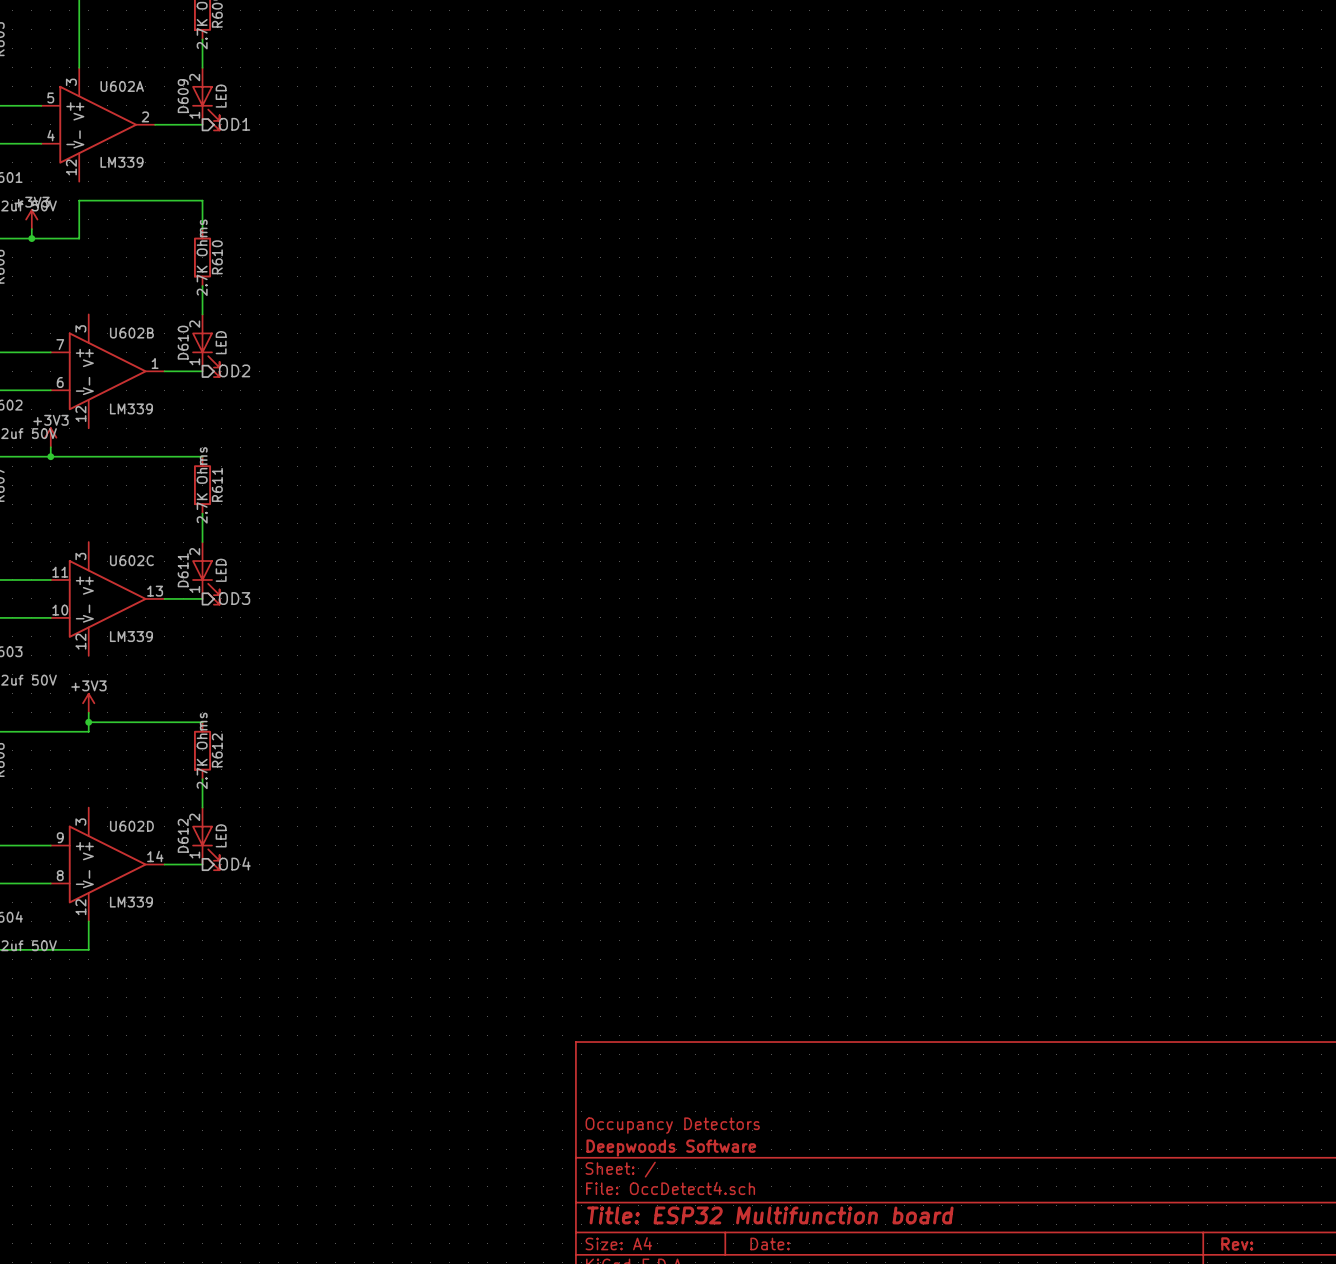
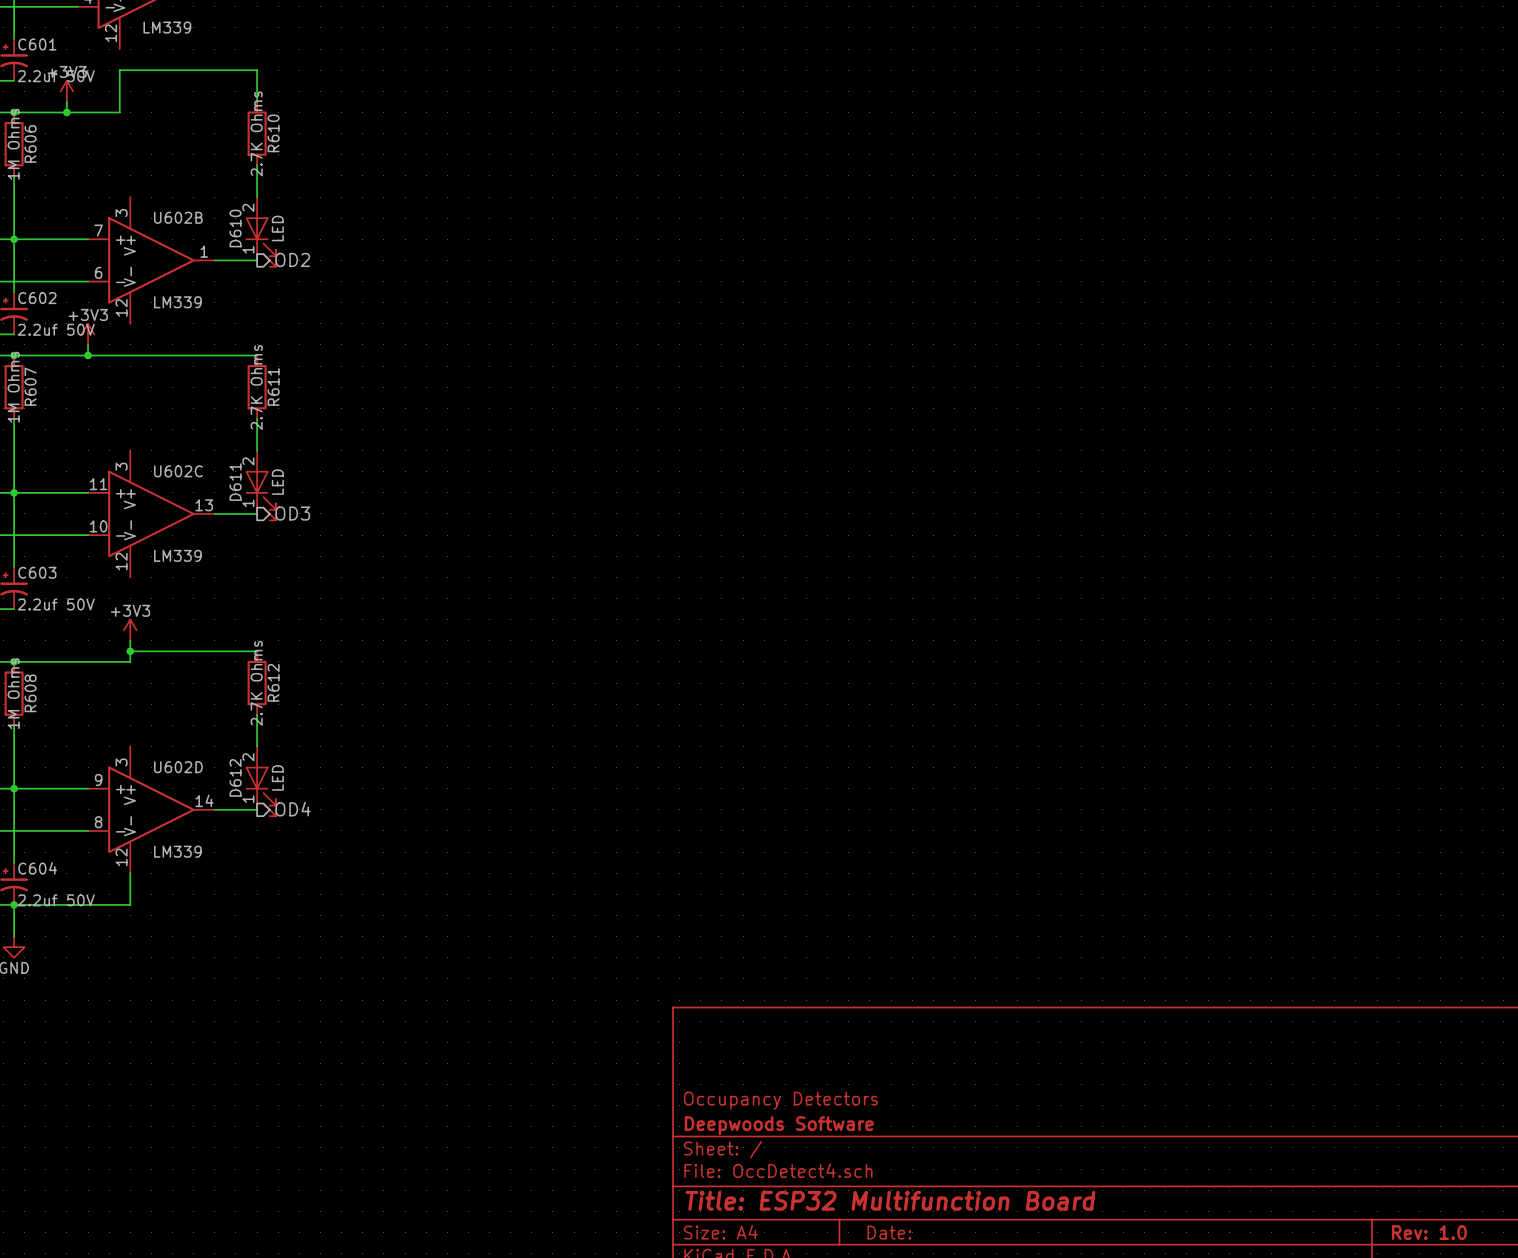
title block: Title: ESP32 Multifunction board (770, 1215) -> Title: ESP32 Multifunction Board (890, 1200)
title block: Rev: (1237, 1243) -> Rev: 1.0 (1429, 1232)

